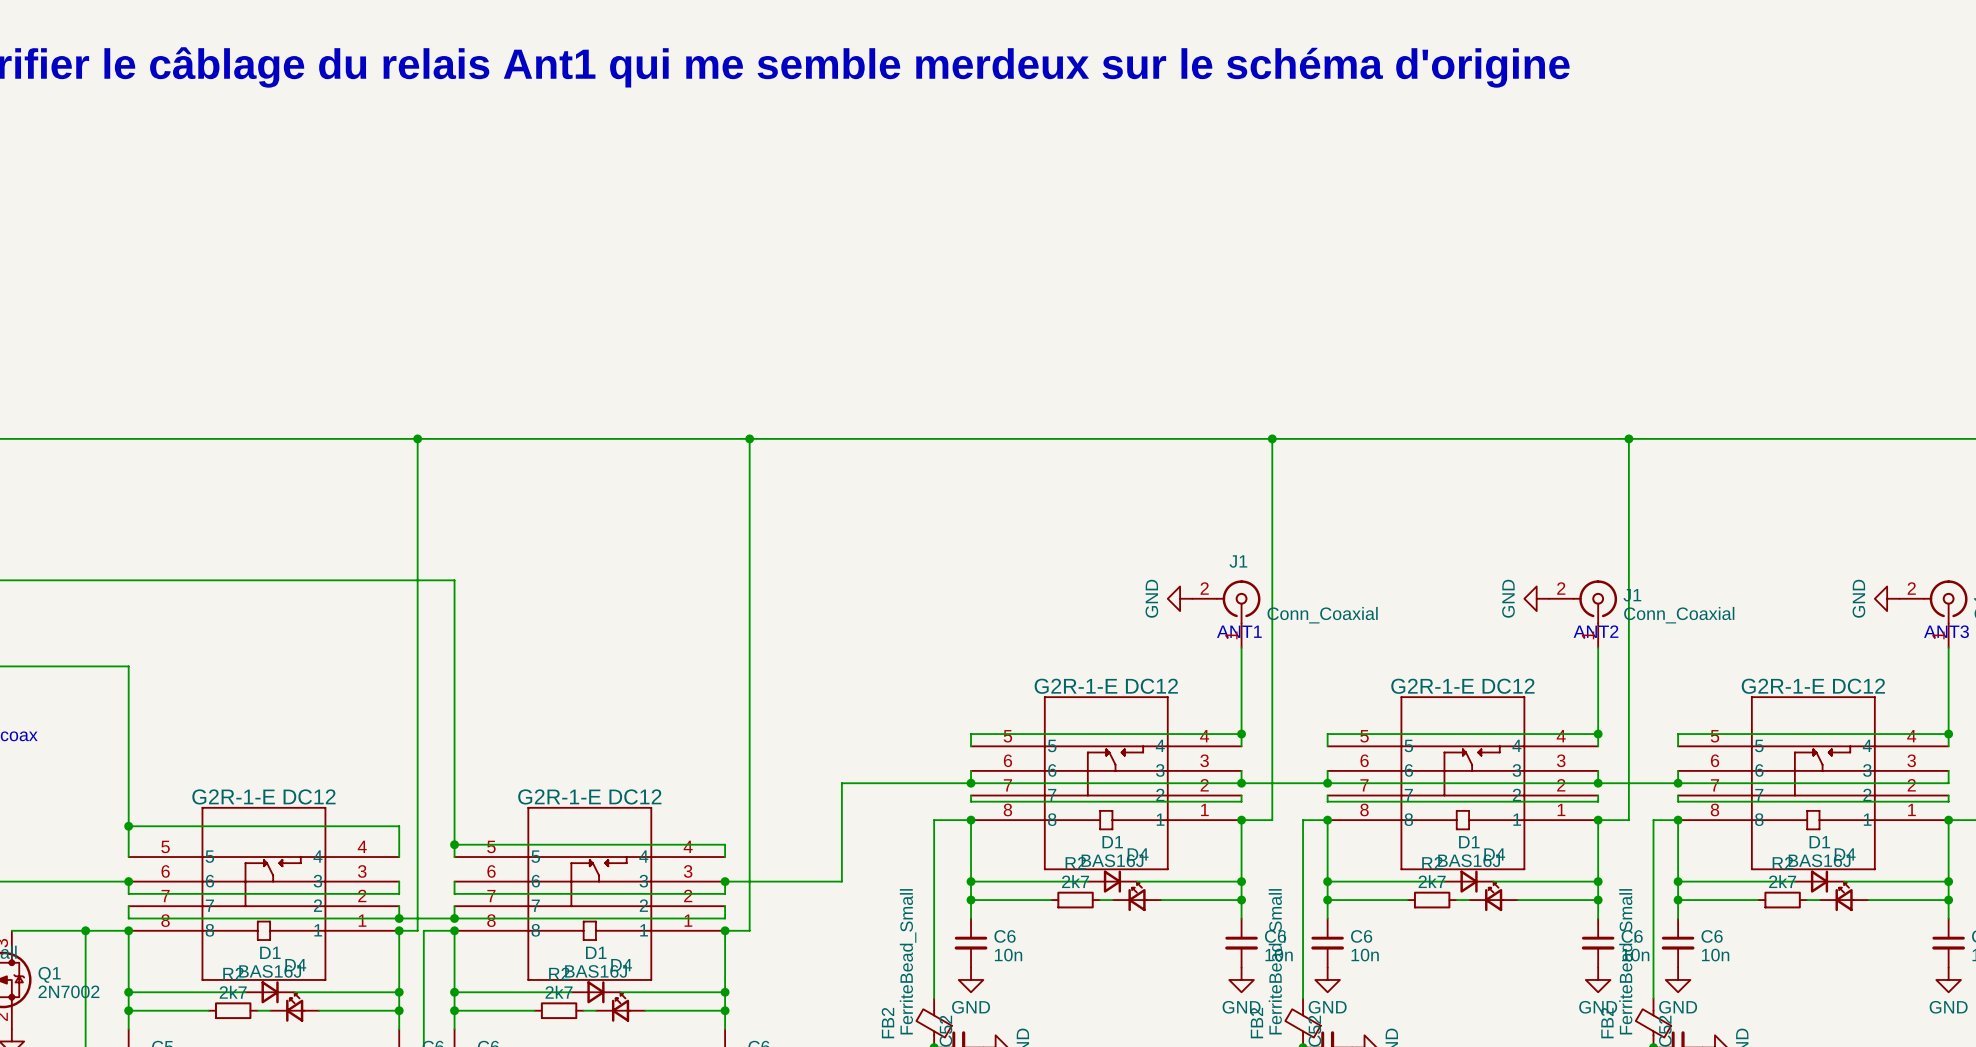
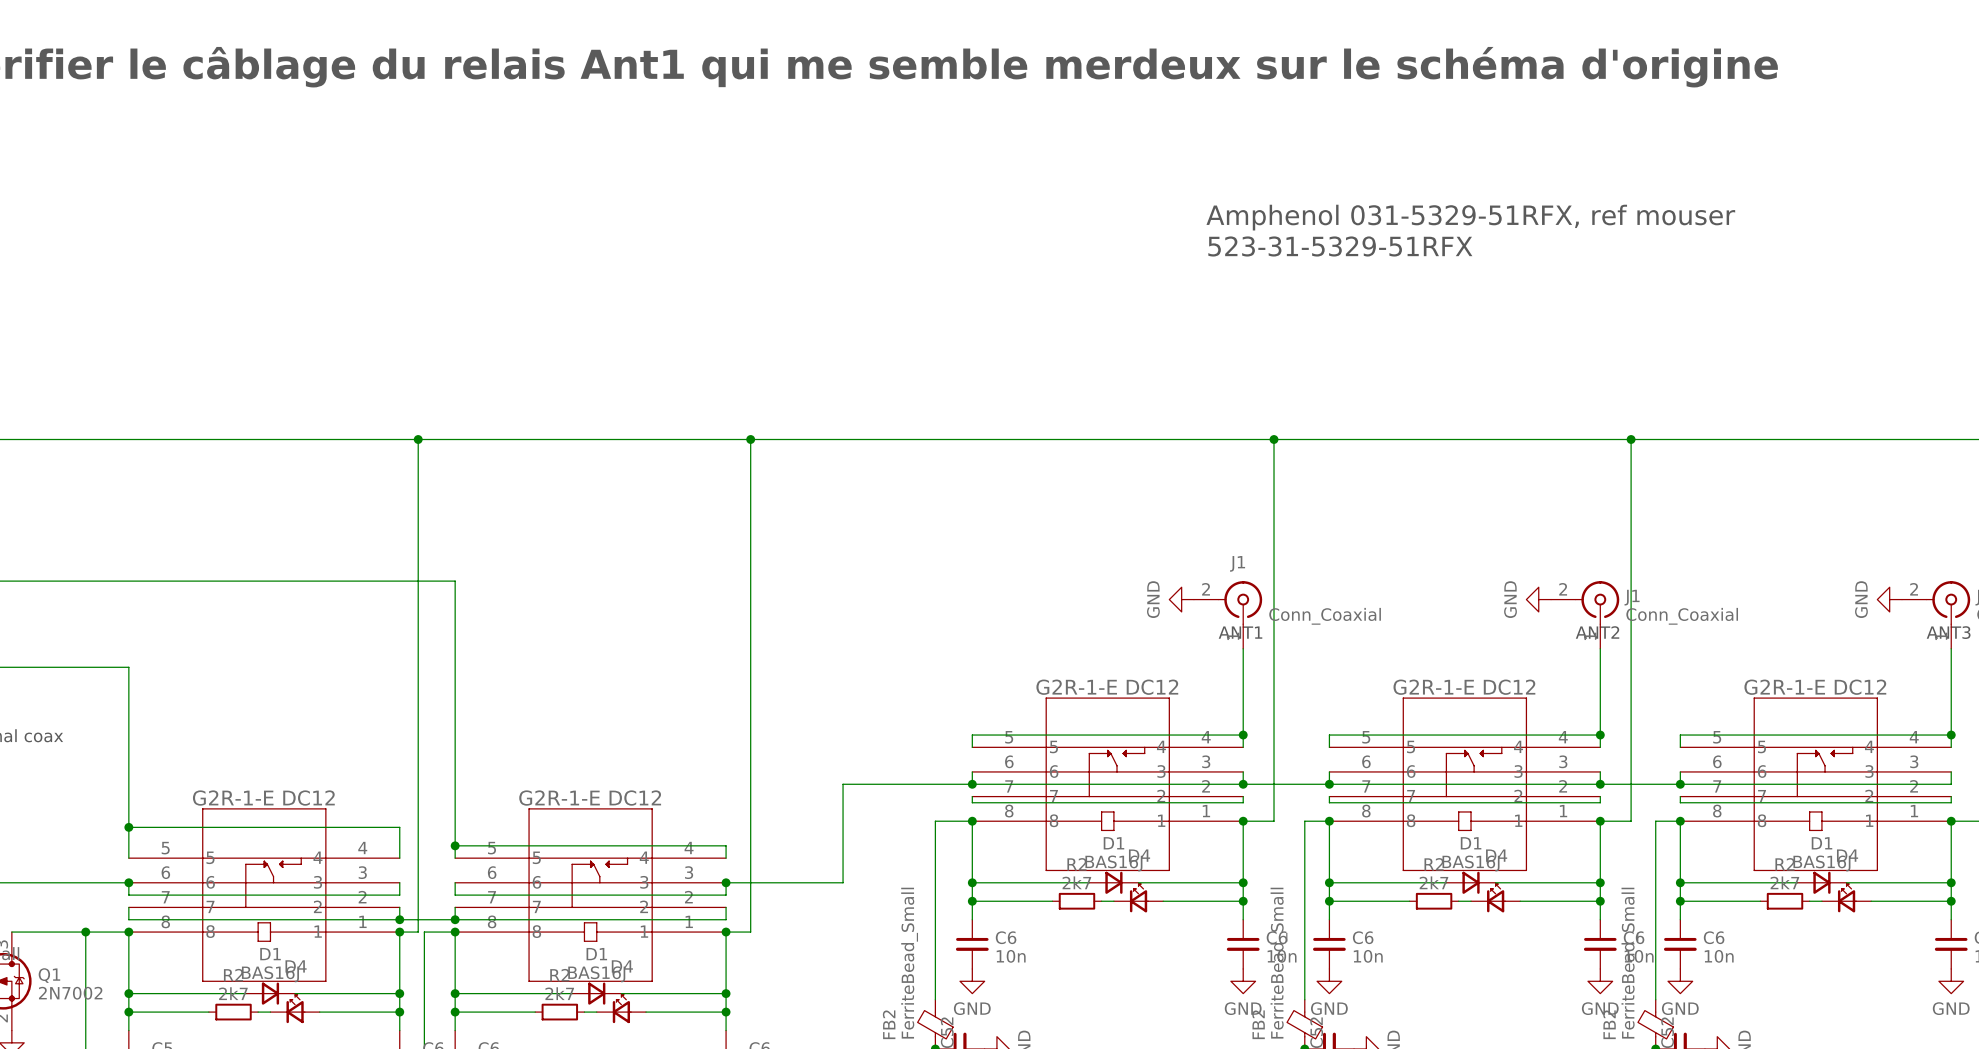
text: none -> Amphenol 031-5329-51RFX, ref mouser (1470, 217)
text: none -> 523-31-5329-51RFX (1340, 246)

